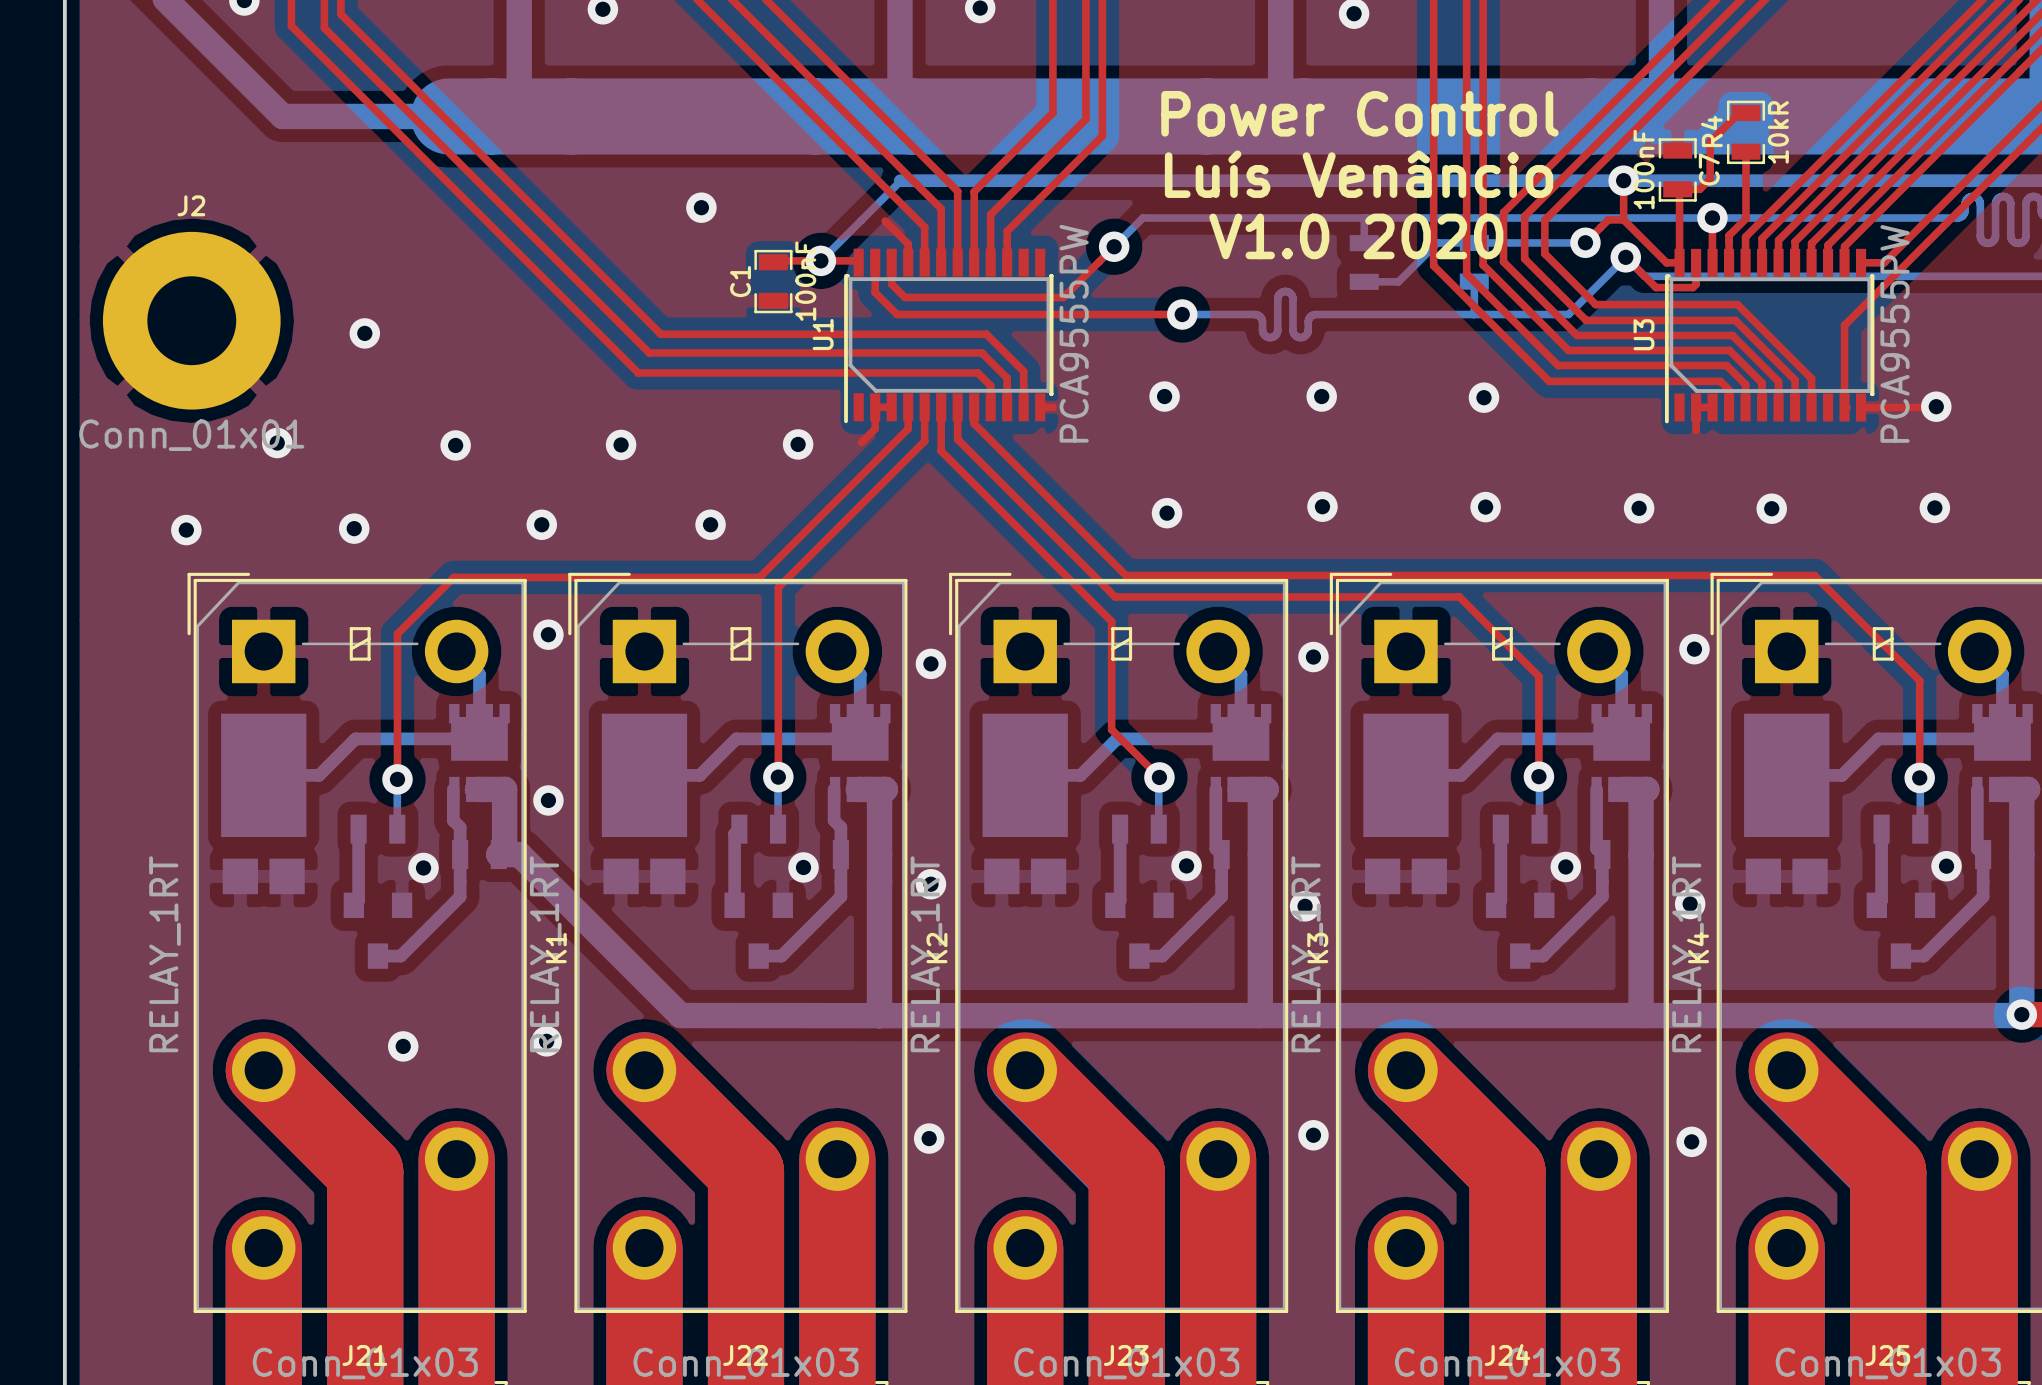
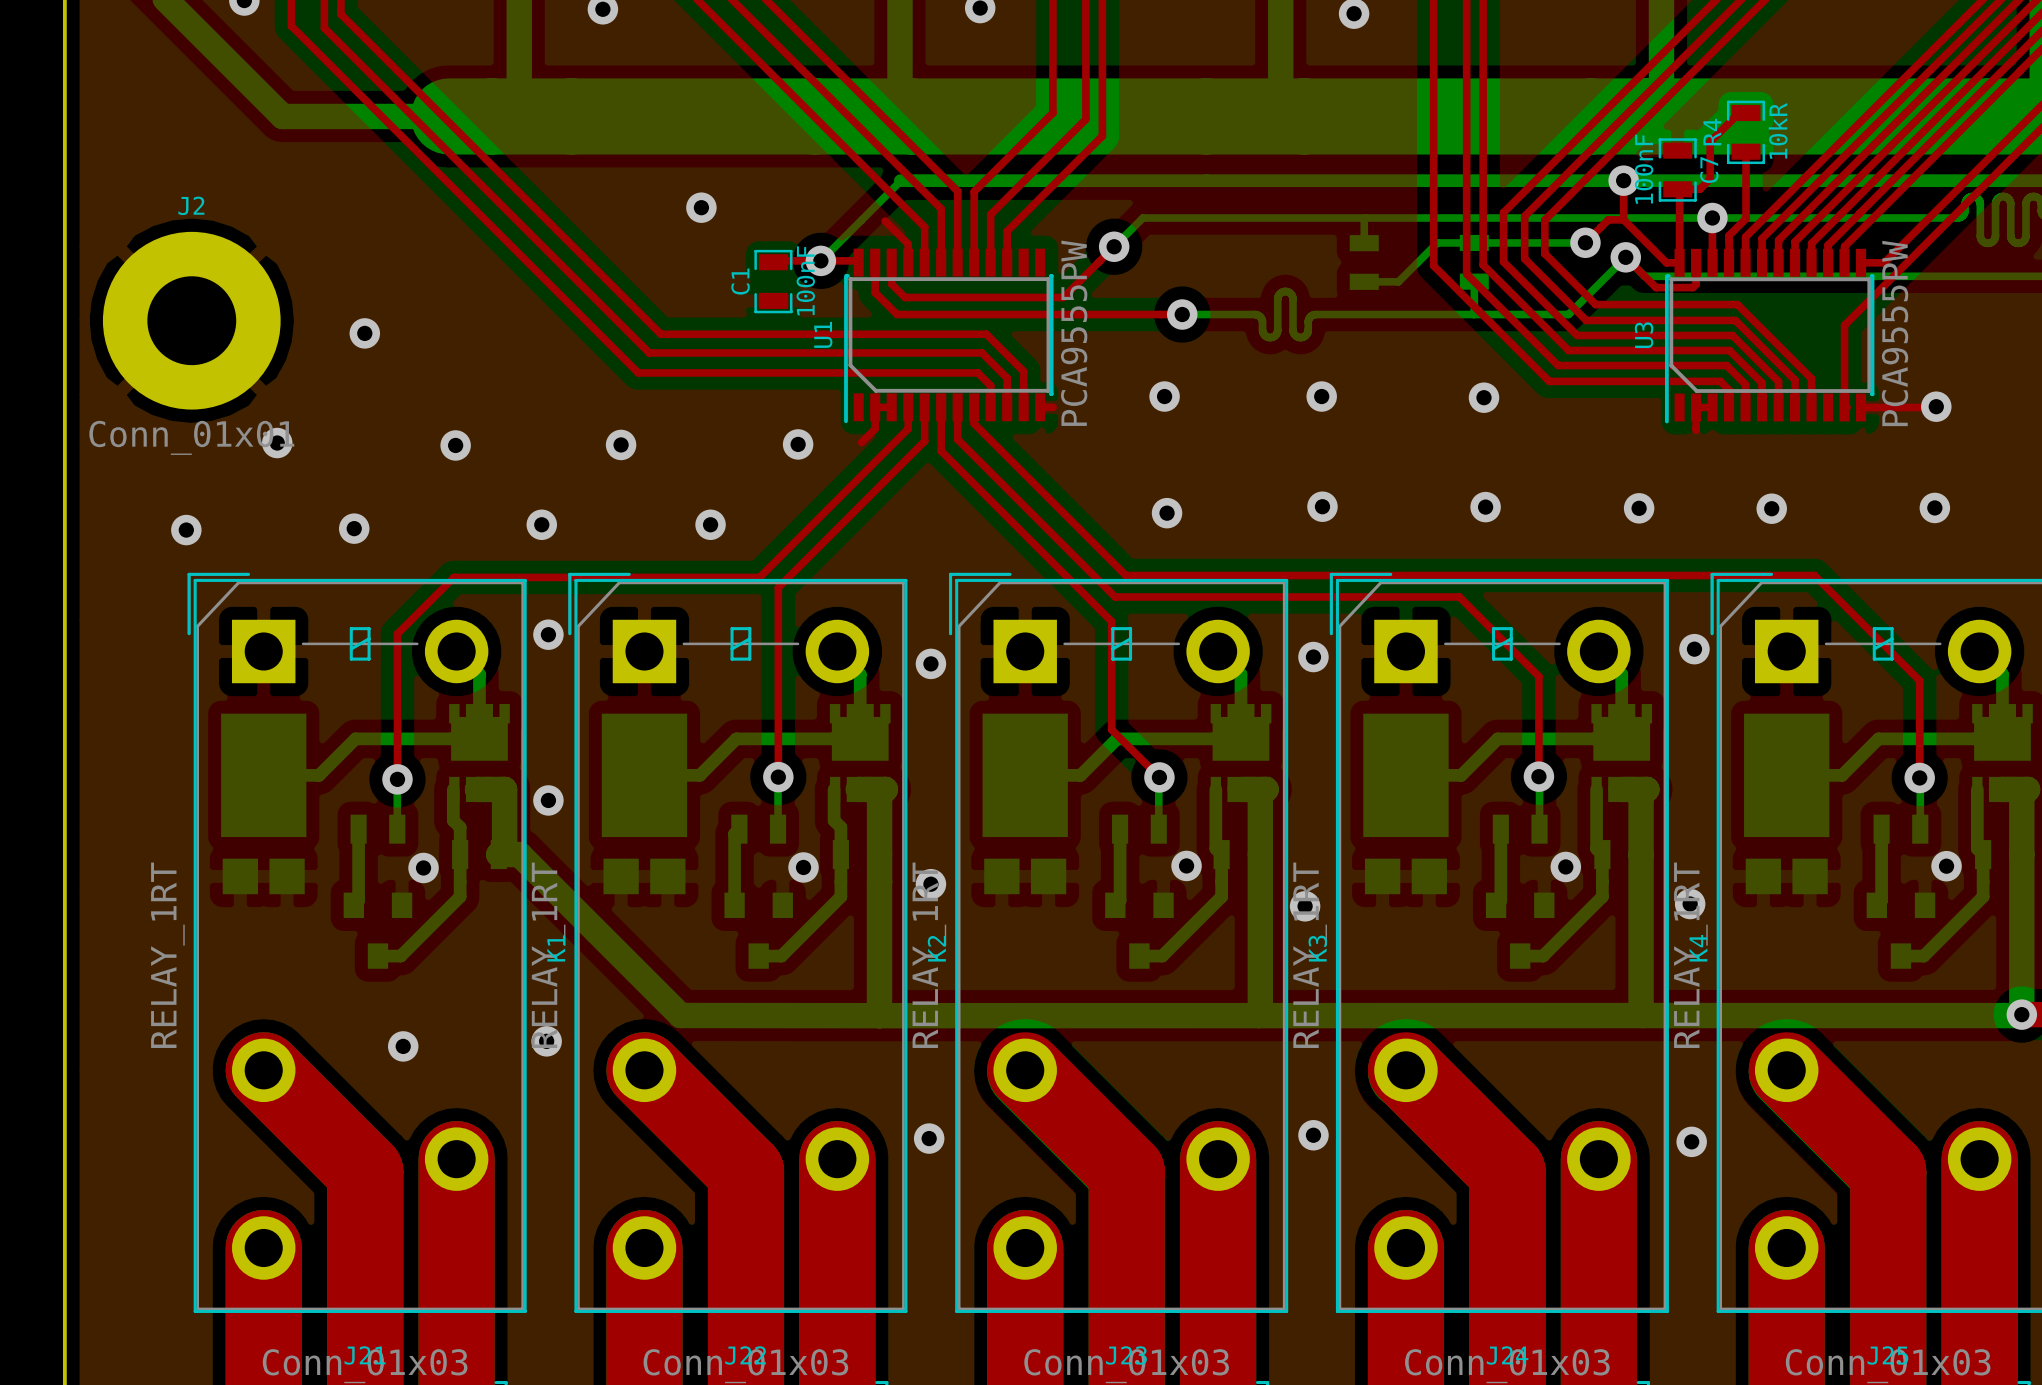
text: Power Control (1359, 113) -> none
text: Luís Venâncio (1359, 174) -> none
text: V1.0 2020 (1356, 236) -> none

